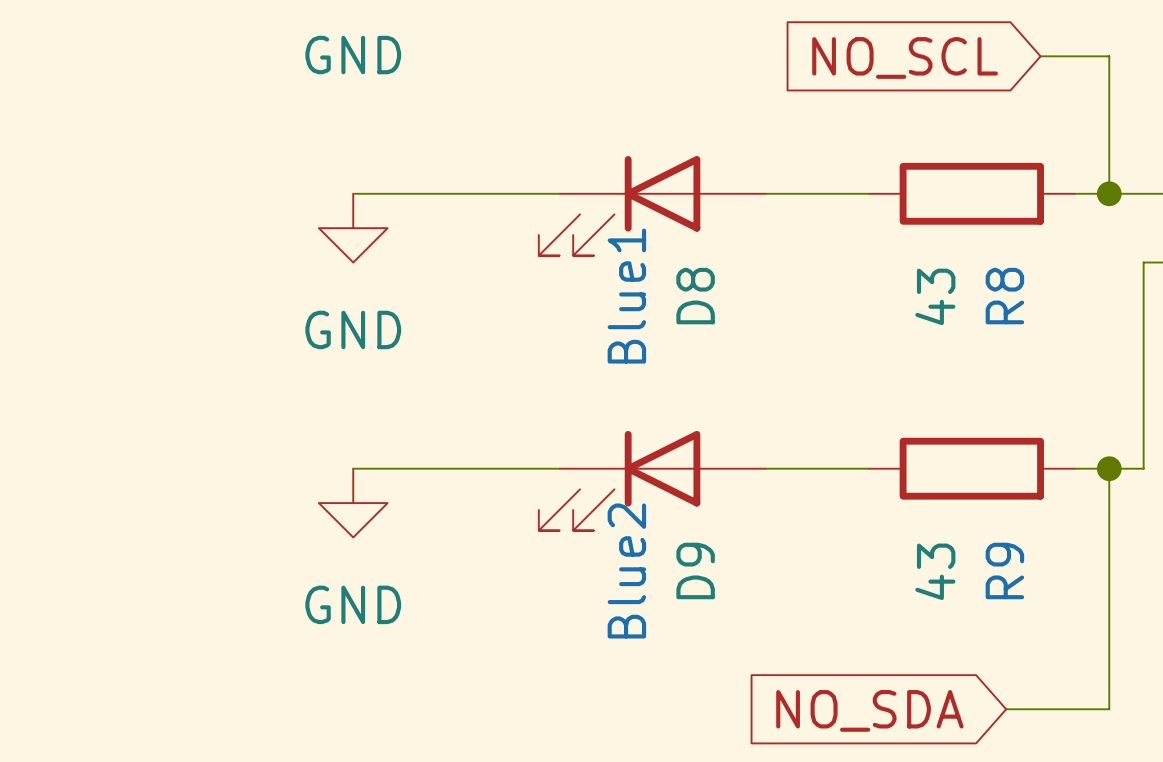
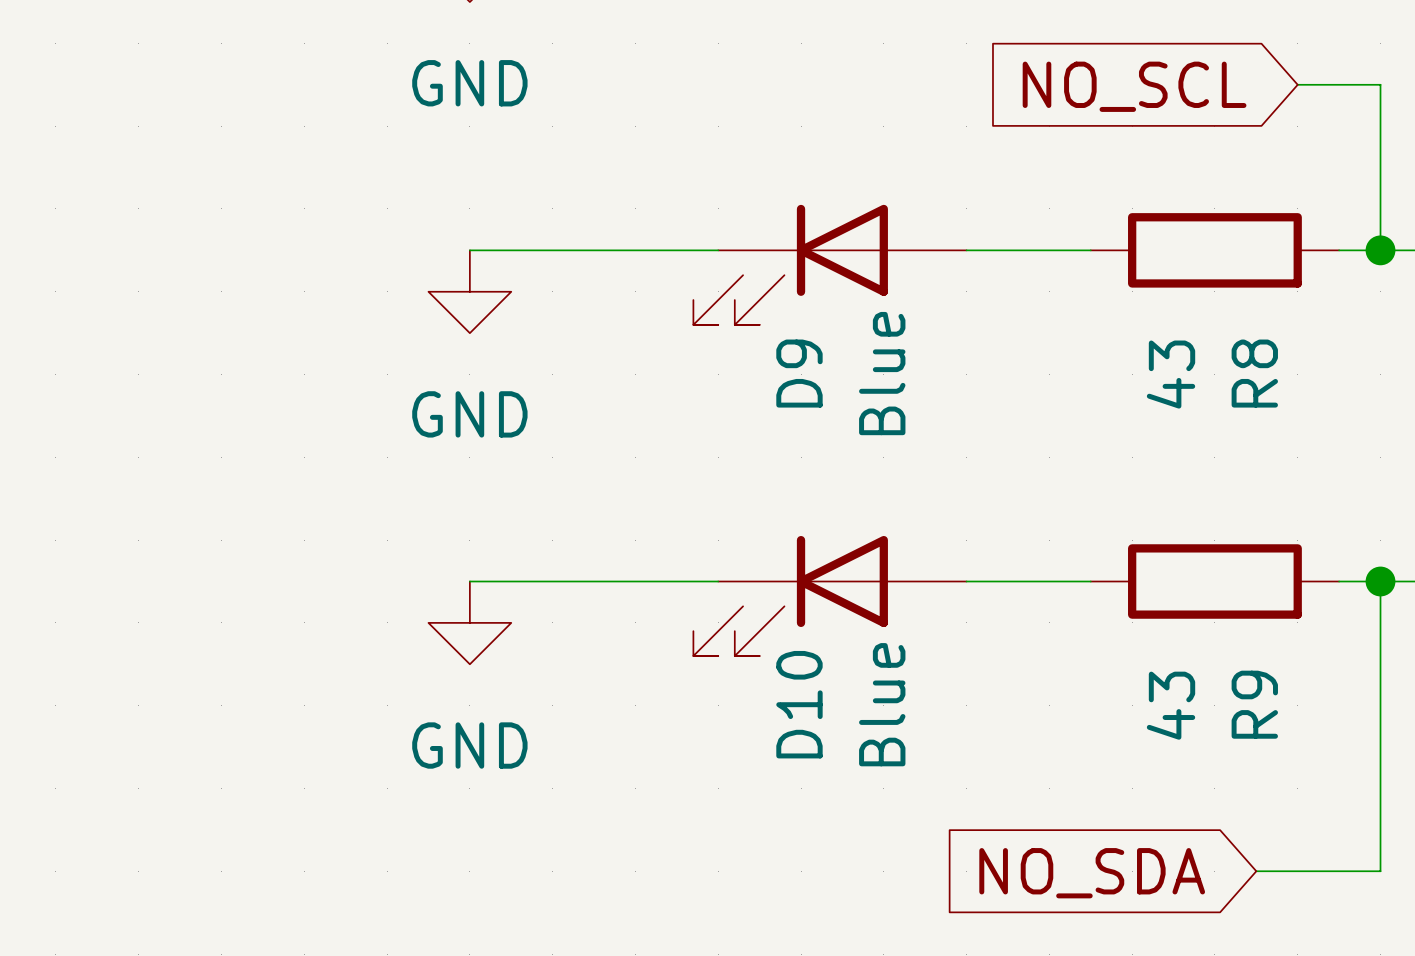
Blue1 name: Blue1 (626, 296) -> D9 (799, 373)
Blue1 value: D8 (695, 296) -> Blue (882, 373)
Blue2 name: Blue2 (626, 570) -> D10 (799, 704)
Blue2 value: D9 (695, 570) -> Blue (882, 704)

